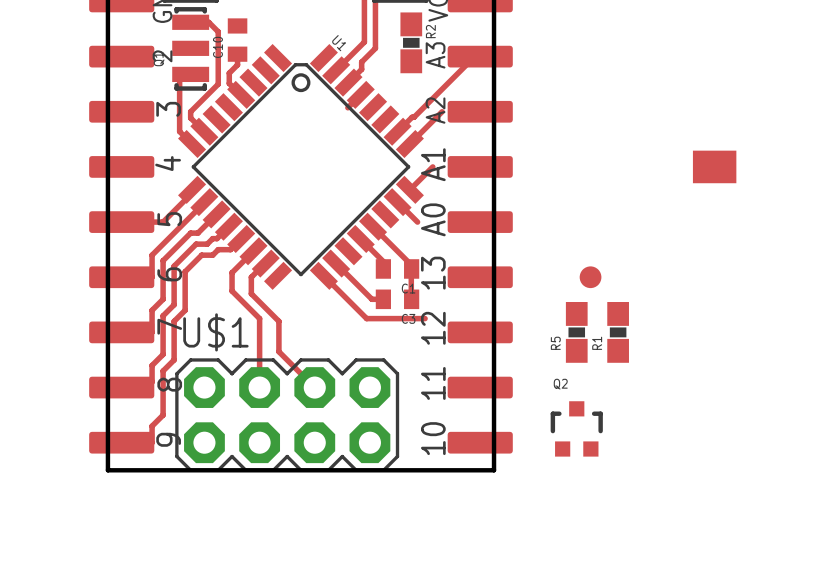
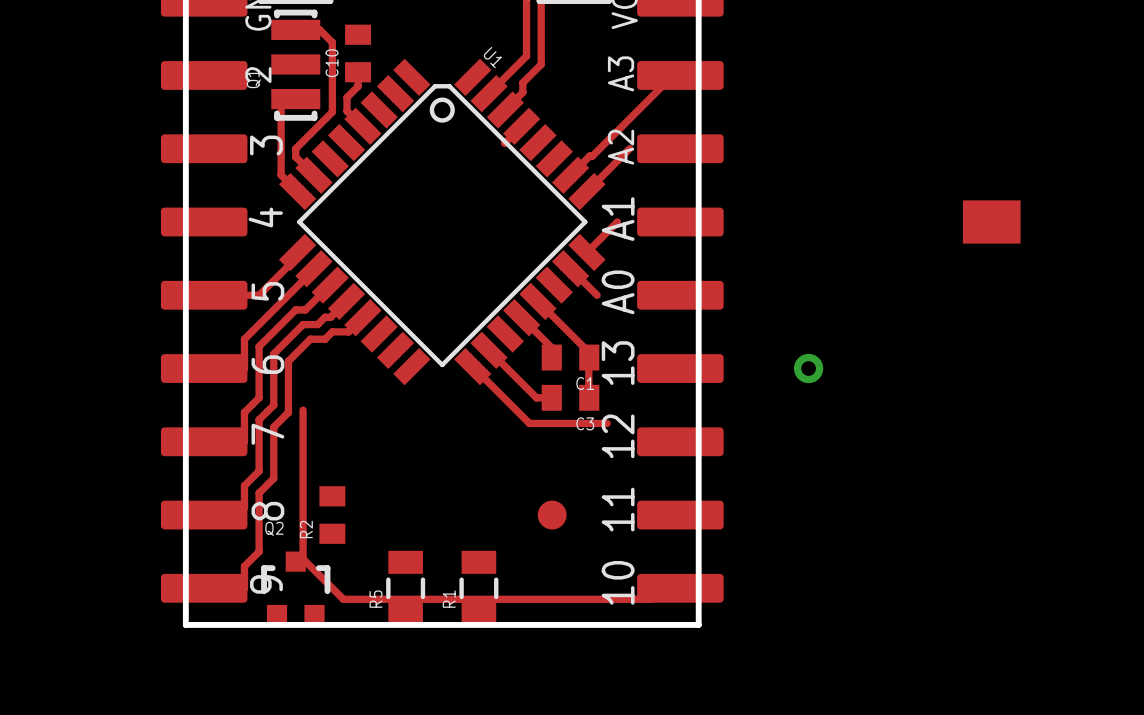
R2 footprint: [400, 12, 423, 74] -> [319, 486, 346, 544]
track: (253, 251) (232, 272) (232, 291) (259, 318) (259, 387) -> none
track: (265, 263) (251, 277) (251, 293) (278, 321) (278, 351) (314, 387) -> none
via: none -> (808, 368)
part position: (590, 277) -> (552, 515)
R5 footprint: [565, 302, 588, 363] -> [386, 550, 426, 626]
R1 footprint: [607, 302, 629, 363] -> [459, 550, 499, 626]
track: none -> (303, 410) (303, 559) (343, 599) (651, 599)
U$1: (287, 415) -> none
Q2 position: (576, 428) -> (295, 588)

